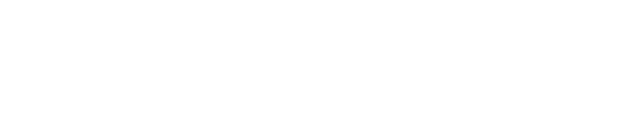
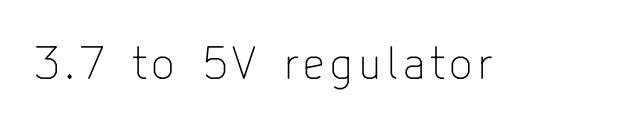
label: none -> 3.7 to 5V regulator (263, 67)

